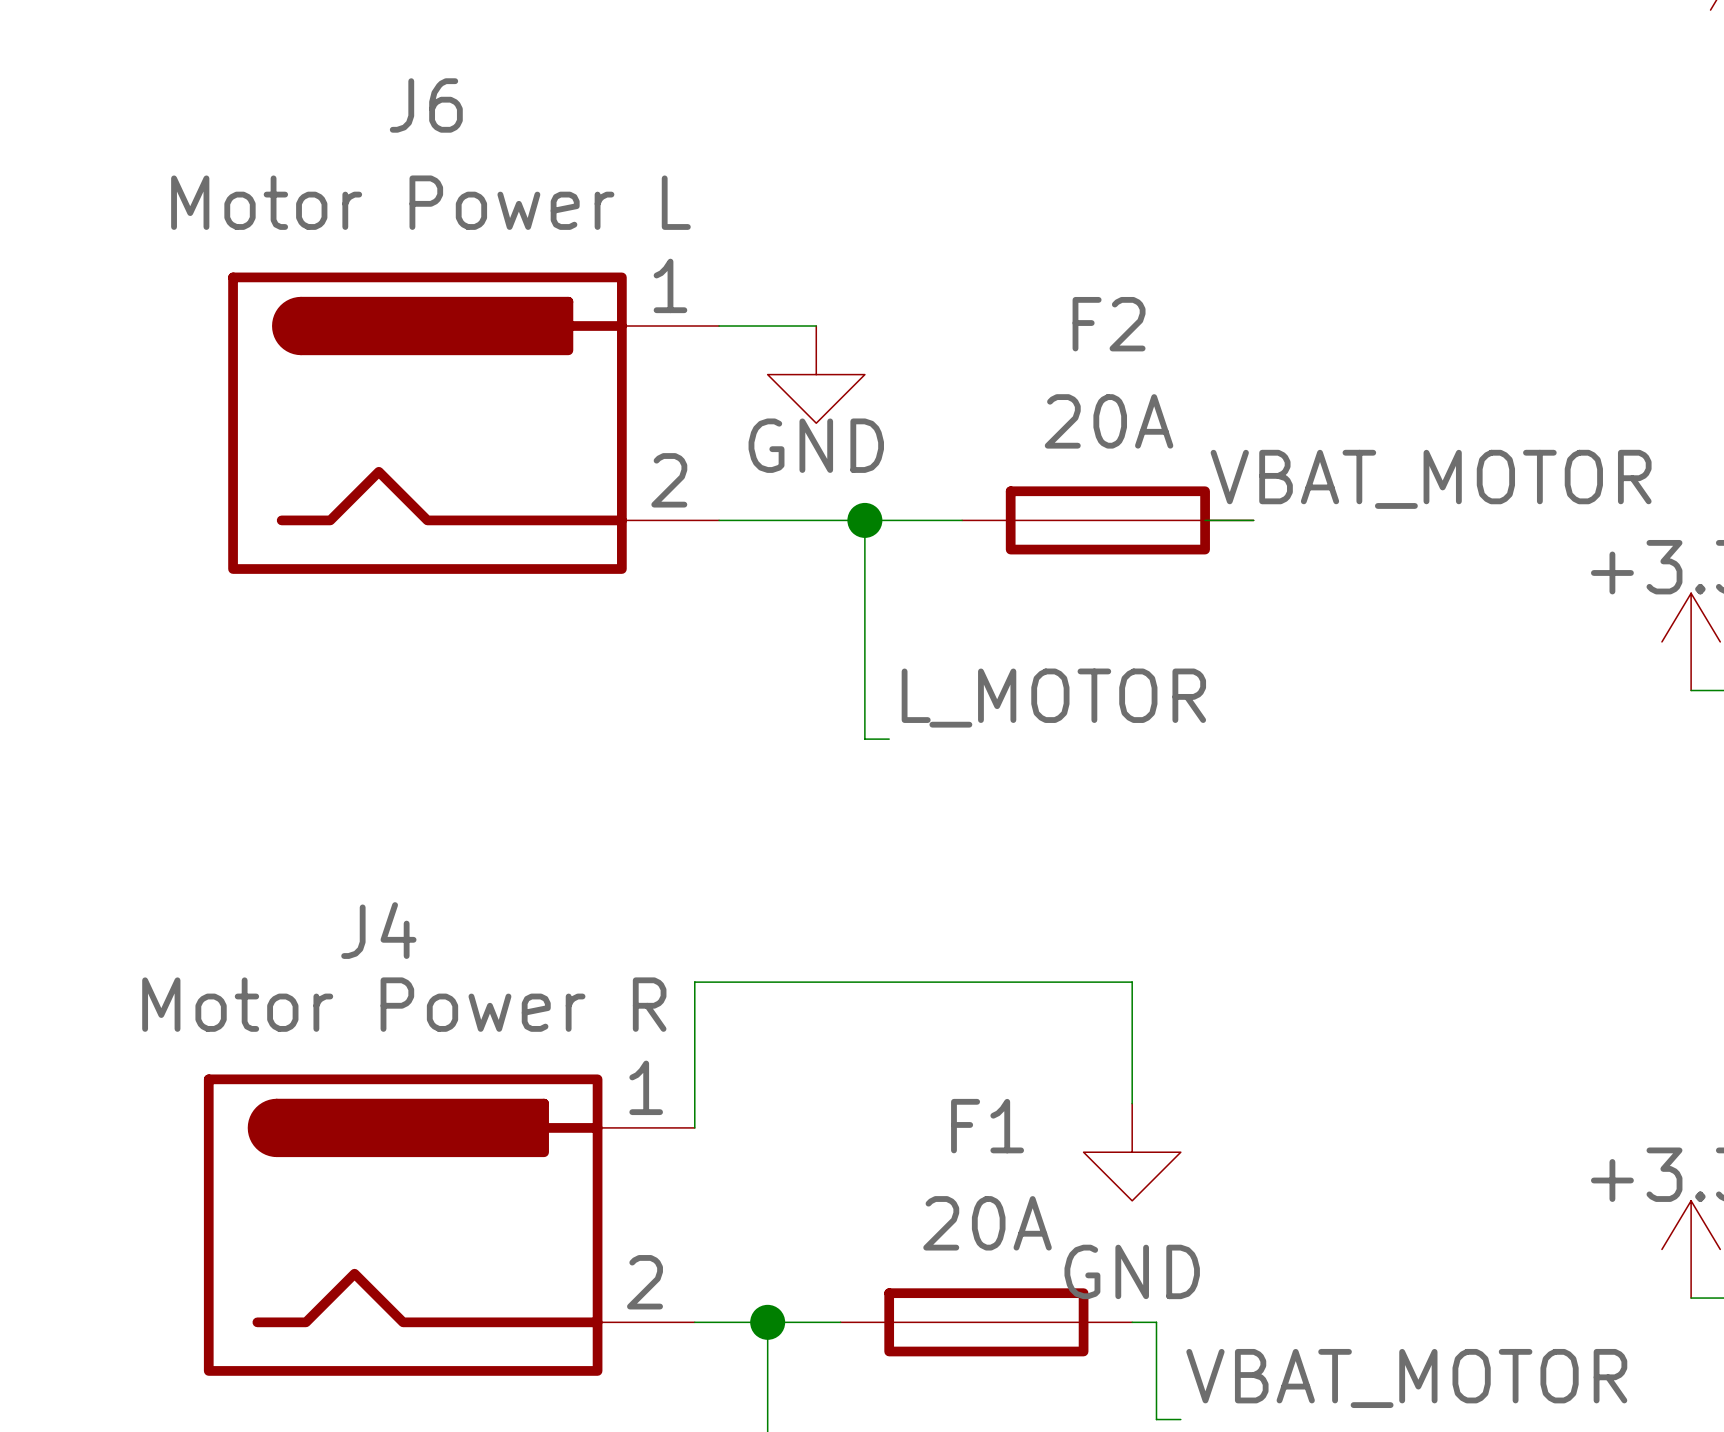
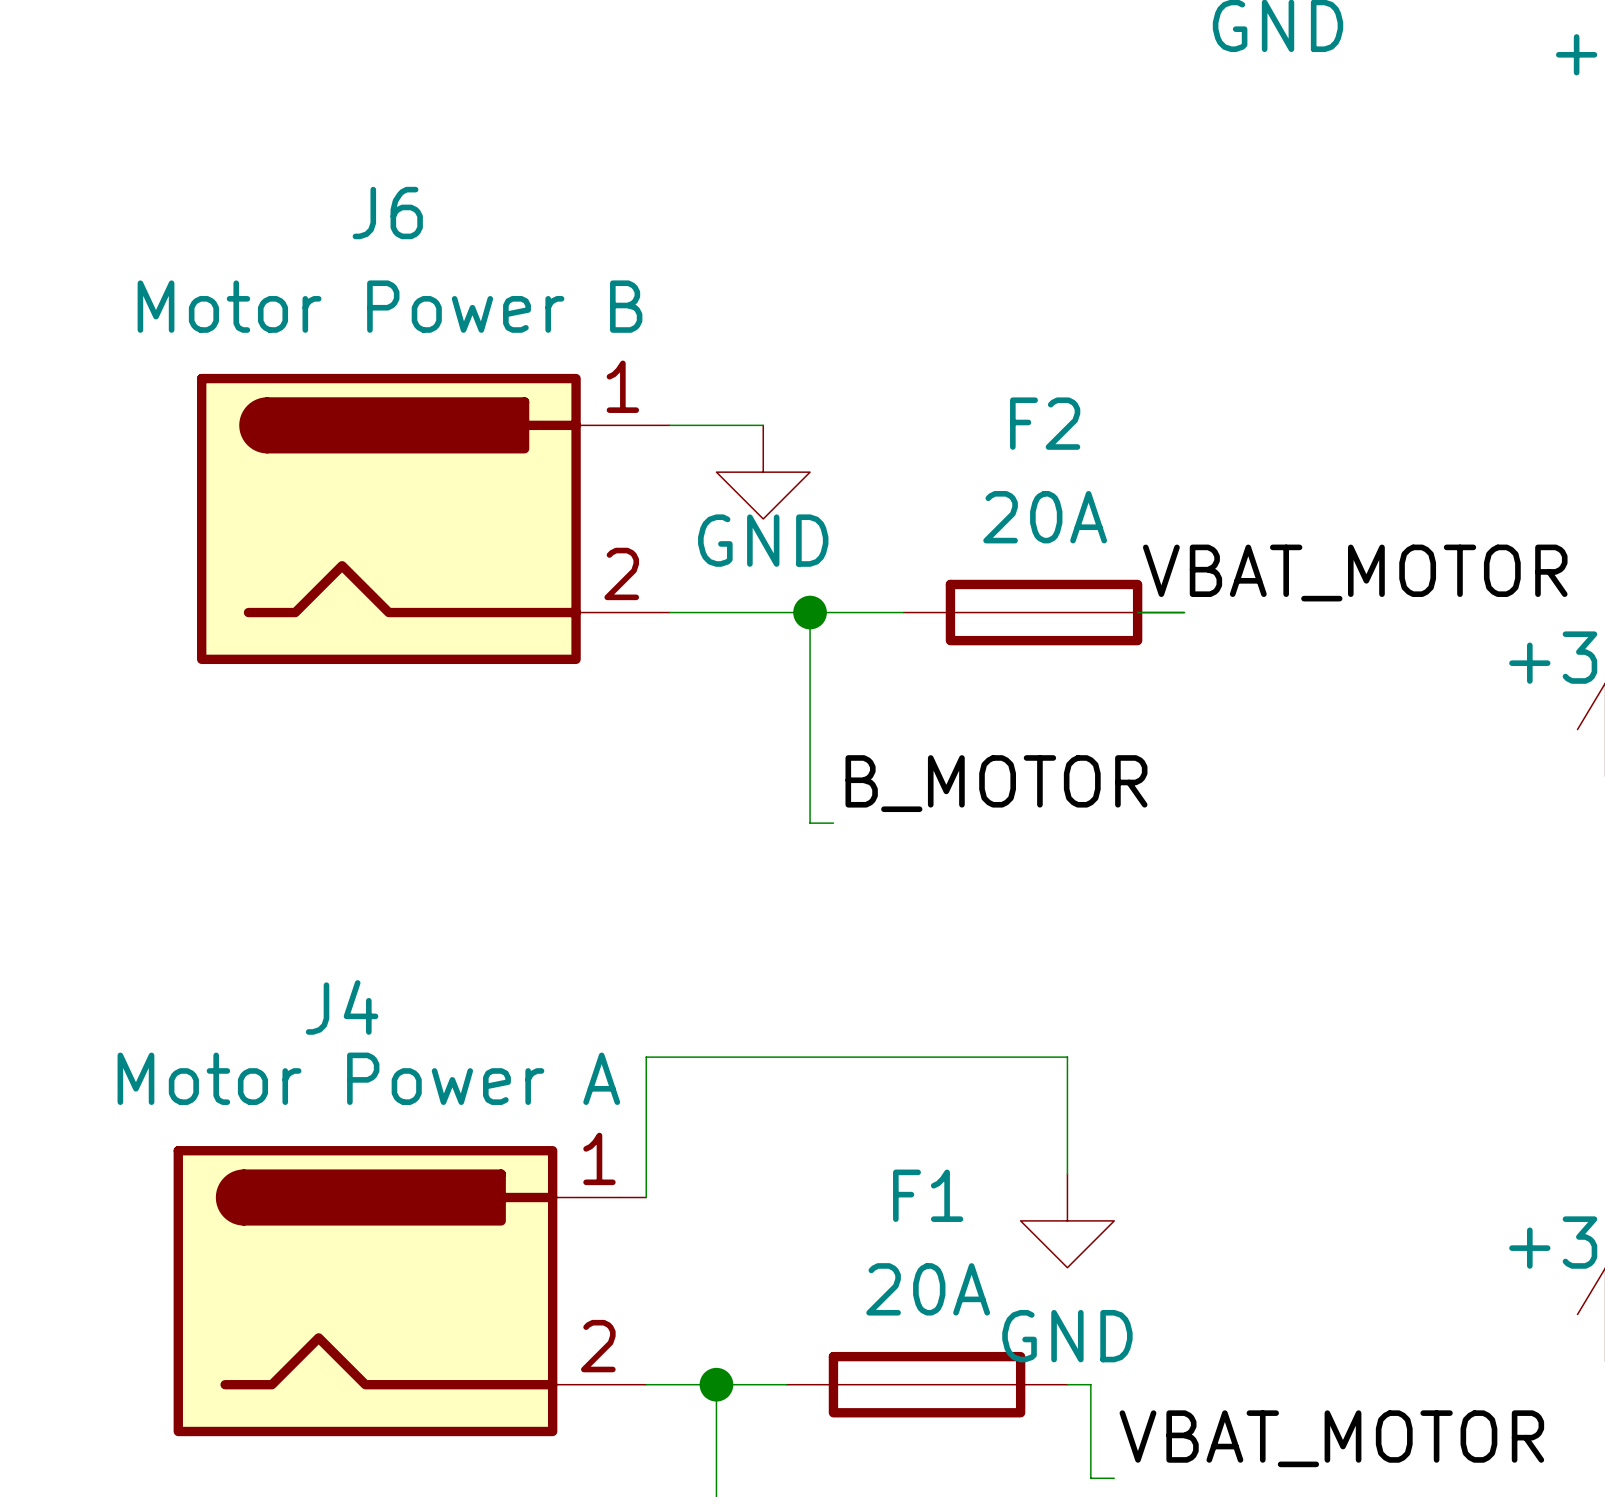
J6 value: Motor Power L (430, 202) -> Motor Power B (389, 306)
label: L_MOTOR (1053, 698) -> B_MOTOR (996, 783)
J4 value: Motor Power R (404, 1004) -> Motor Power A (368, 1078)

